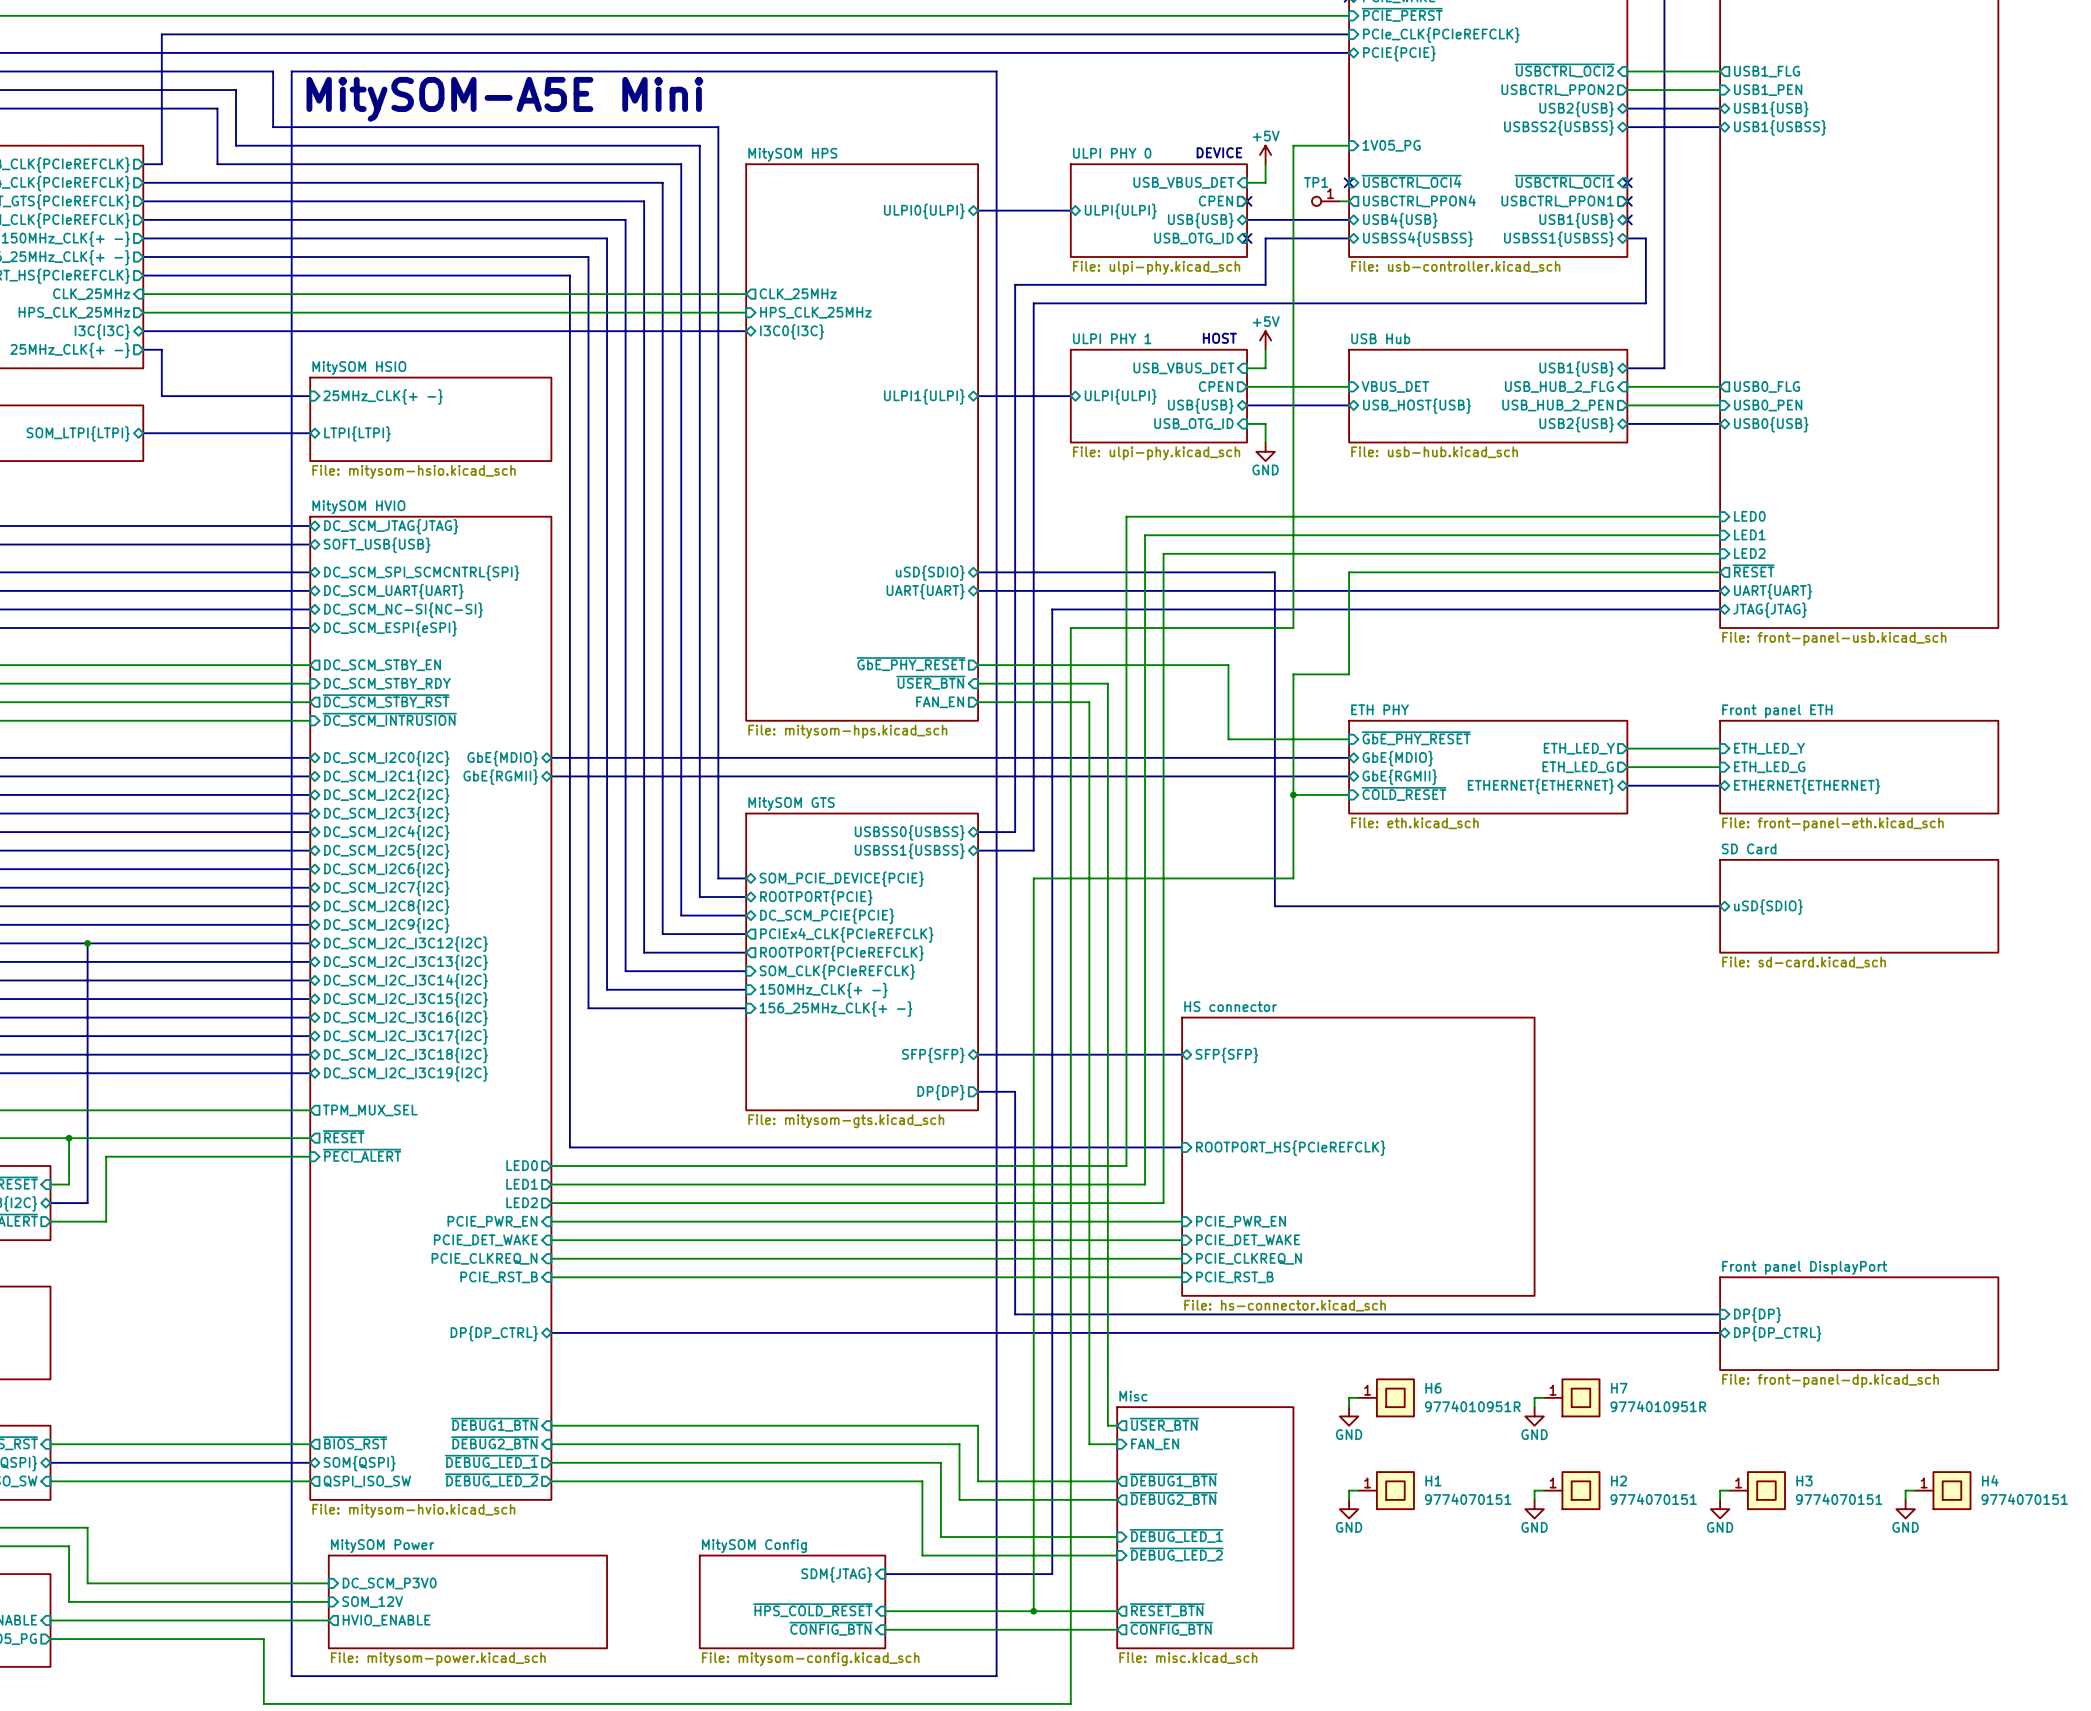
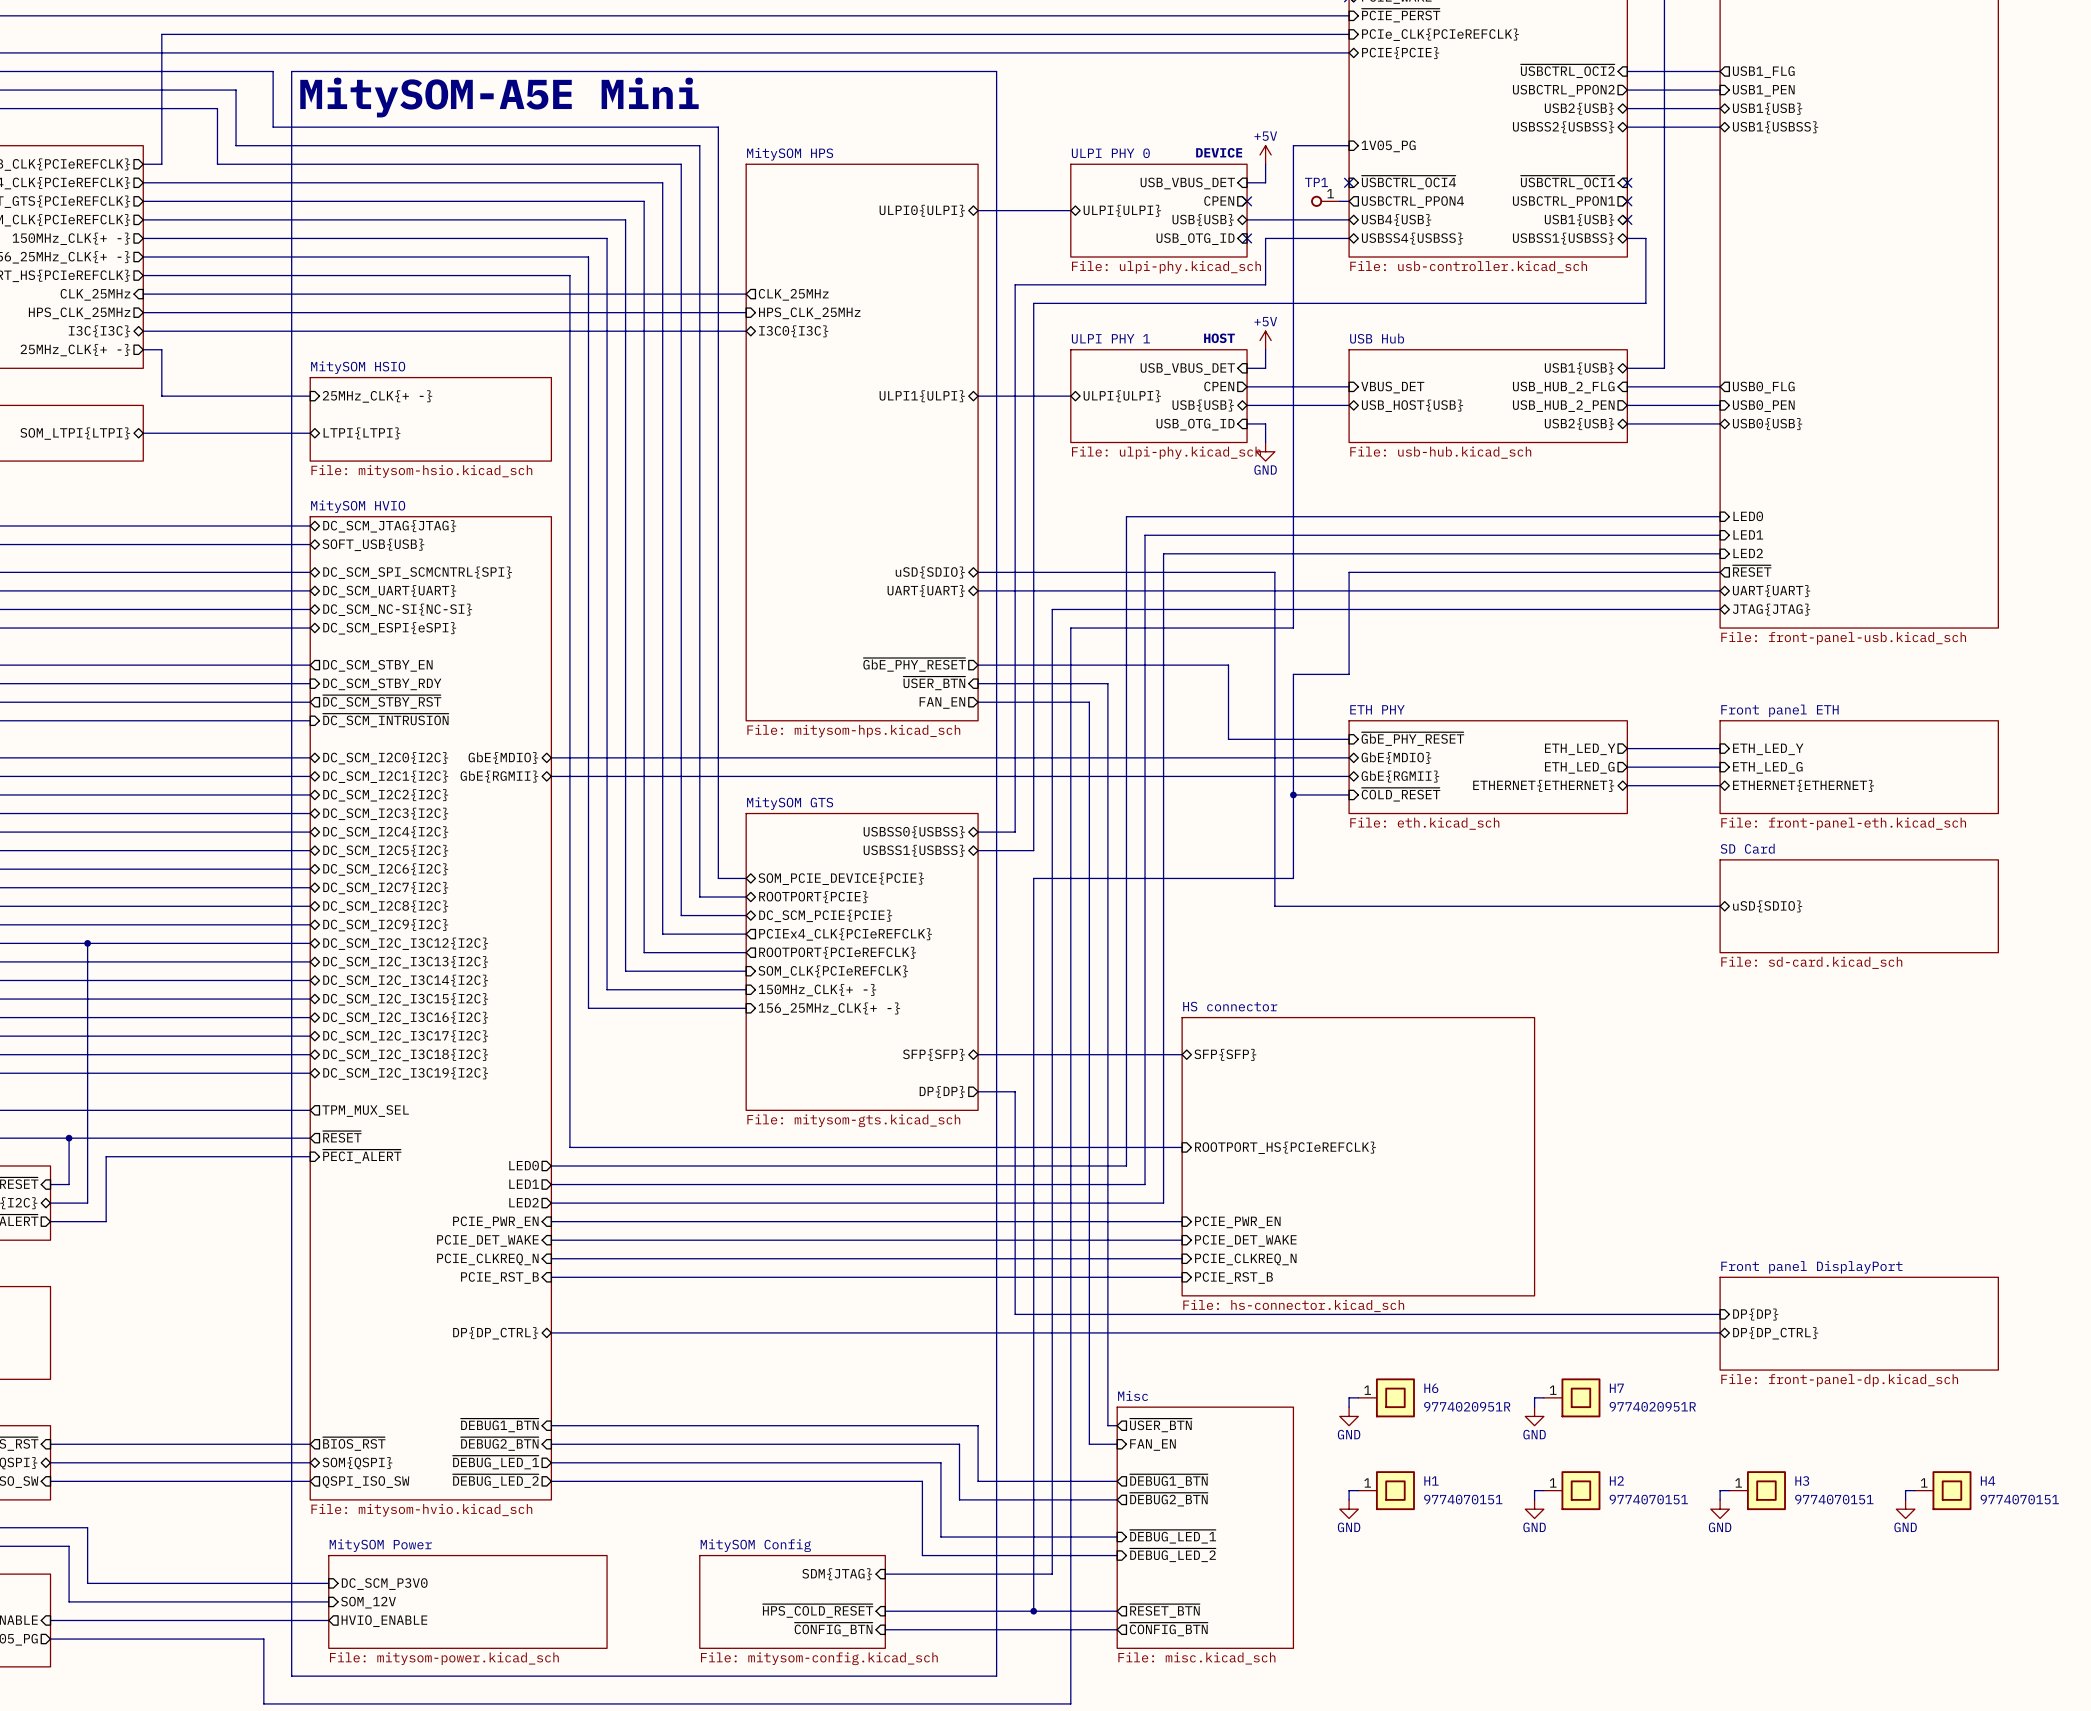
H6 text: 9774010951R (1472, 1406) -> 9774020951R (1467, 1406)
H7 text: 9774010951R (1658, 1406) -> 9774020951R (1652, 1406)

